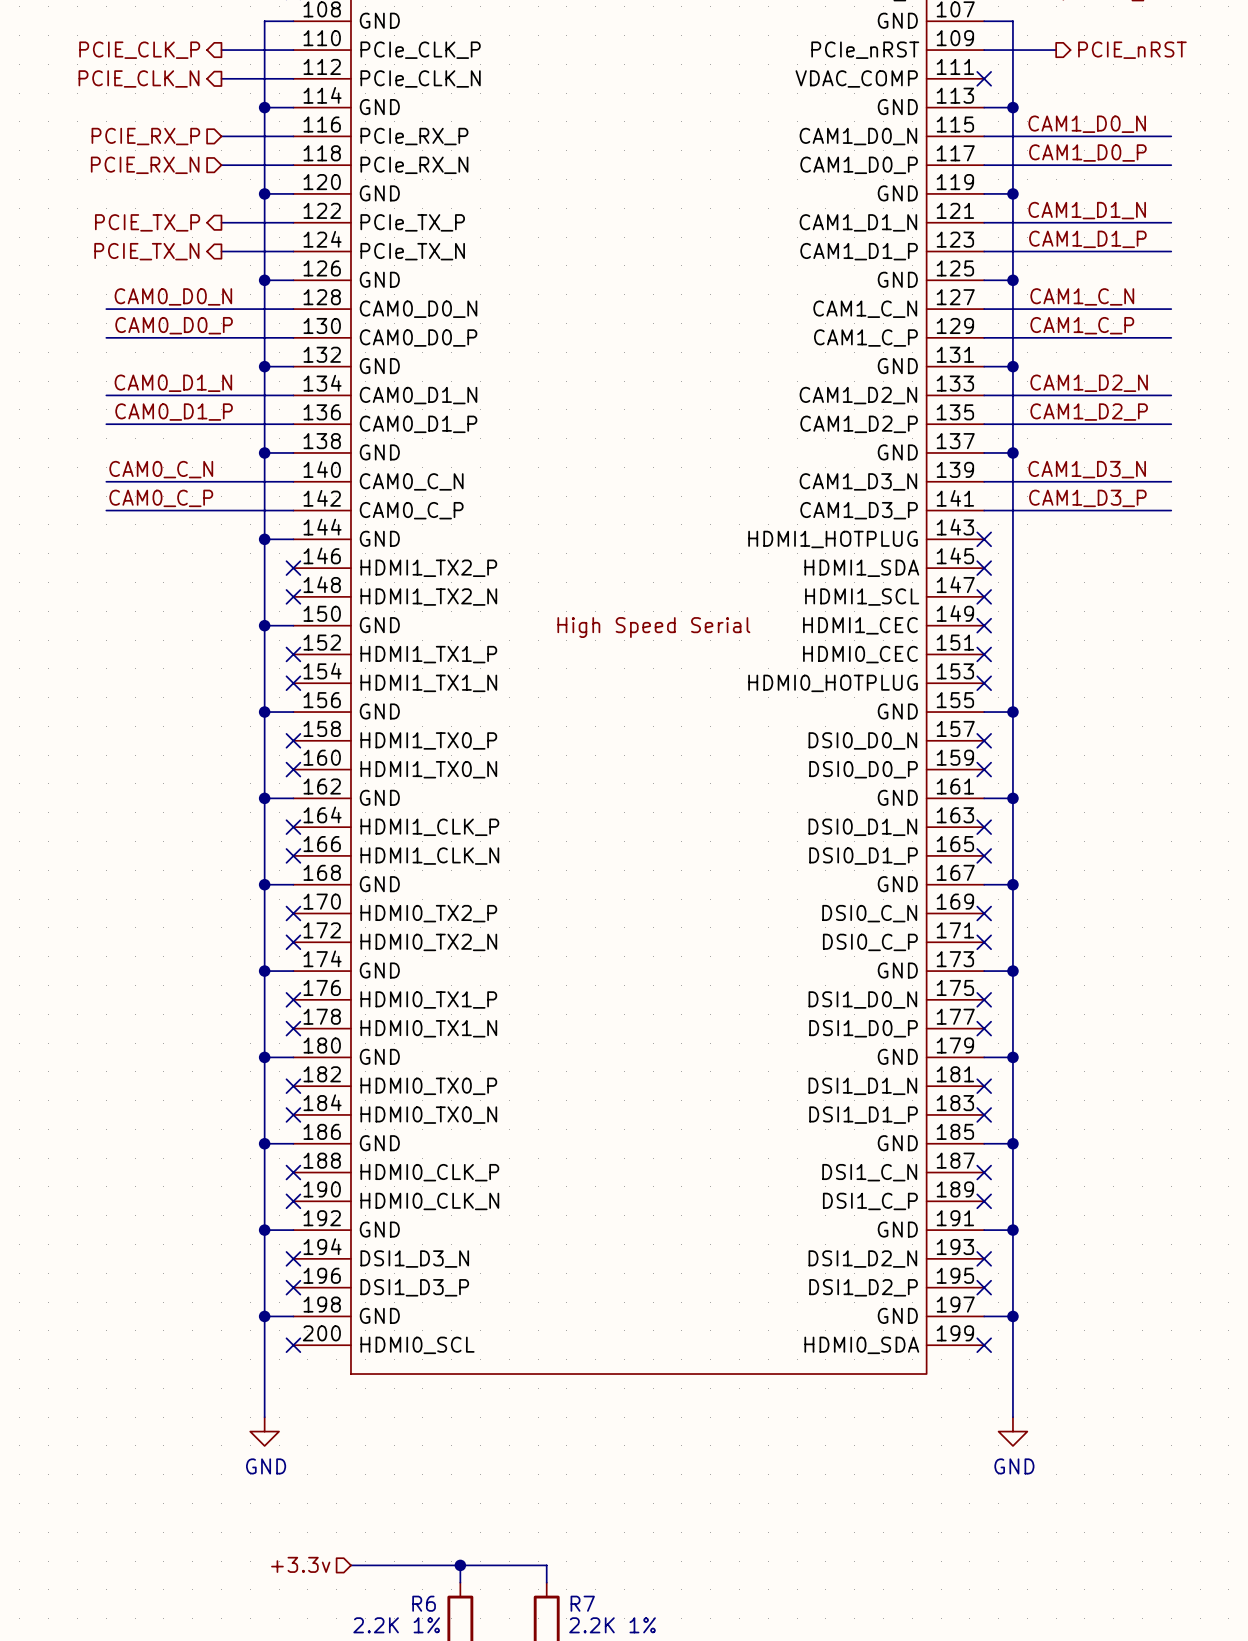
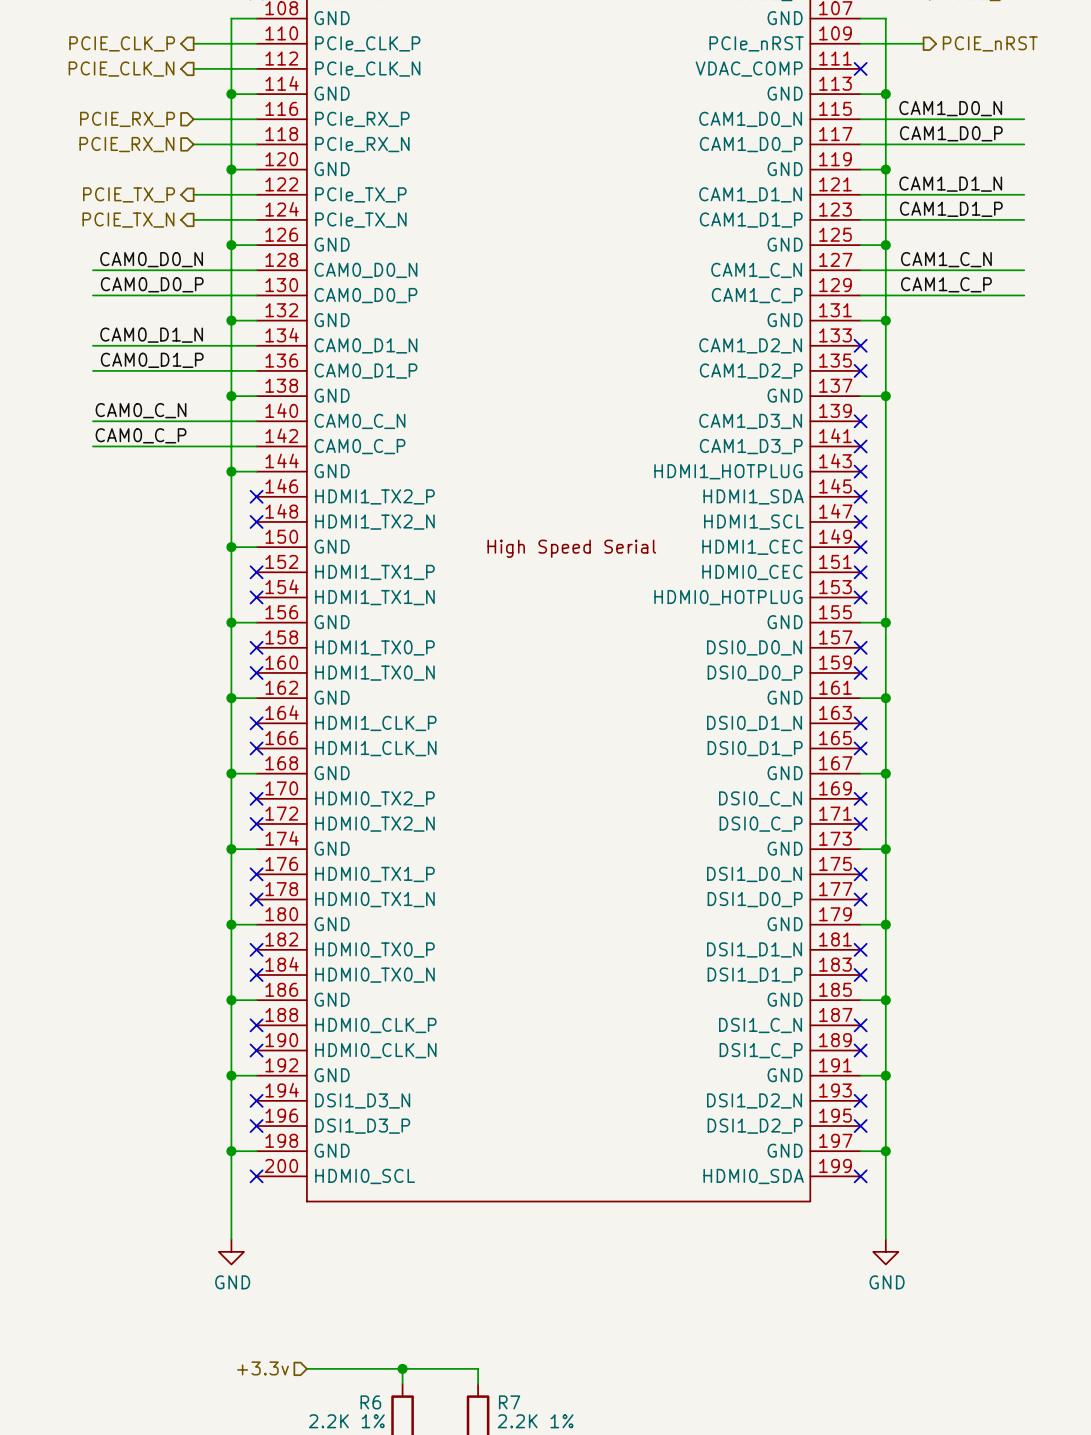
label: CAM1_D2_N (1089, 383) -> none
wire: (984, 395) (1171, 395) -> none
no-connect mark: none -> (860, 345)
label: CAM1_D2_P (1089, 412) -> none
wire: (984, 424) (1171, 424) -> none
no-connect mark: none -> (860, 370)
label: CAM1_D3_N (1087, 469) -> none
wire: (984, 481) (1171, 481) -> none
no-connect mark: none -> (860, 421)
label: CAM1_D3_P (1087, 498) -> none
wire: (984, 510) (1171, 510) -> none
no-connect mark: none -> (860, 446)

